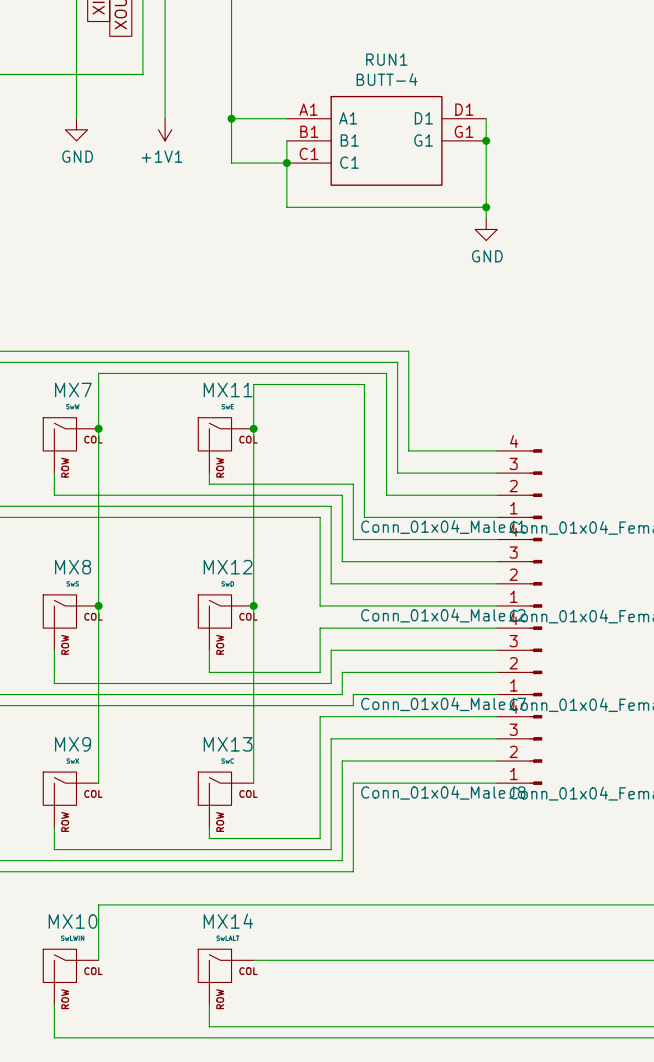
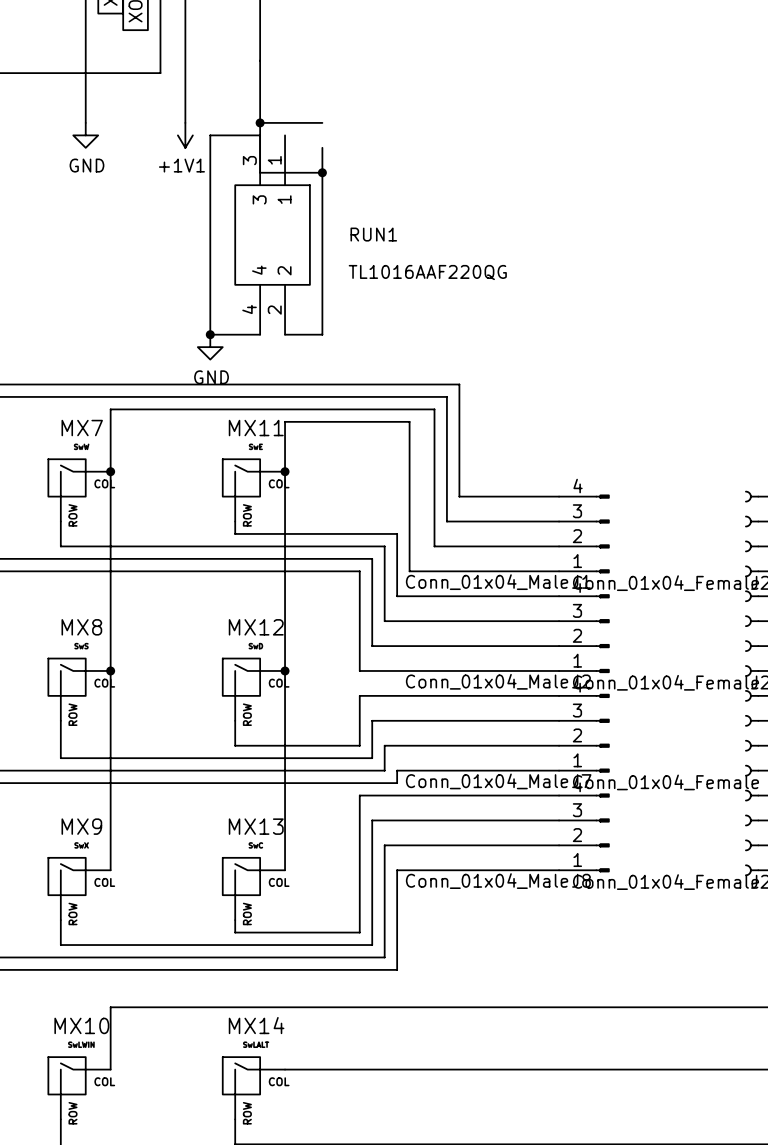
RUN1 name position: RUN1 (386, 59) -> RUN1 (373, 234)
RUN1 value: BUTT-4 (387, 79) -> TL1016AAF220QG (427, 272)
RUN1 symbol: [286, 95, 487, 186] -> [234, 135, 311, 335]
wire: (486, 118) (486, 218) -> none
wire: none -> (260, 135) (210, 135) (210, 334) (260, 334)
junction: (486, 140) -> none
wire: (286, 207) (486, 207) -> (322, 222) (322, 334) (285, 334)
junction: (486, 207) -> none
power symbol: GND (486, 229) -> none
junction: none -> (210, 334)
power symbol: none -> GND (210, 347)

